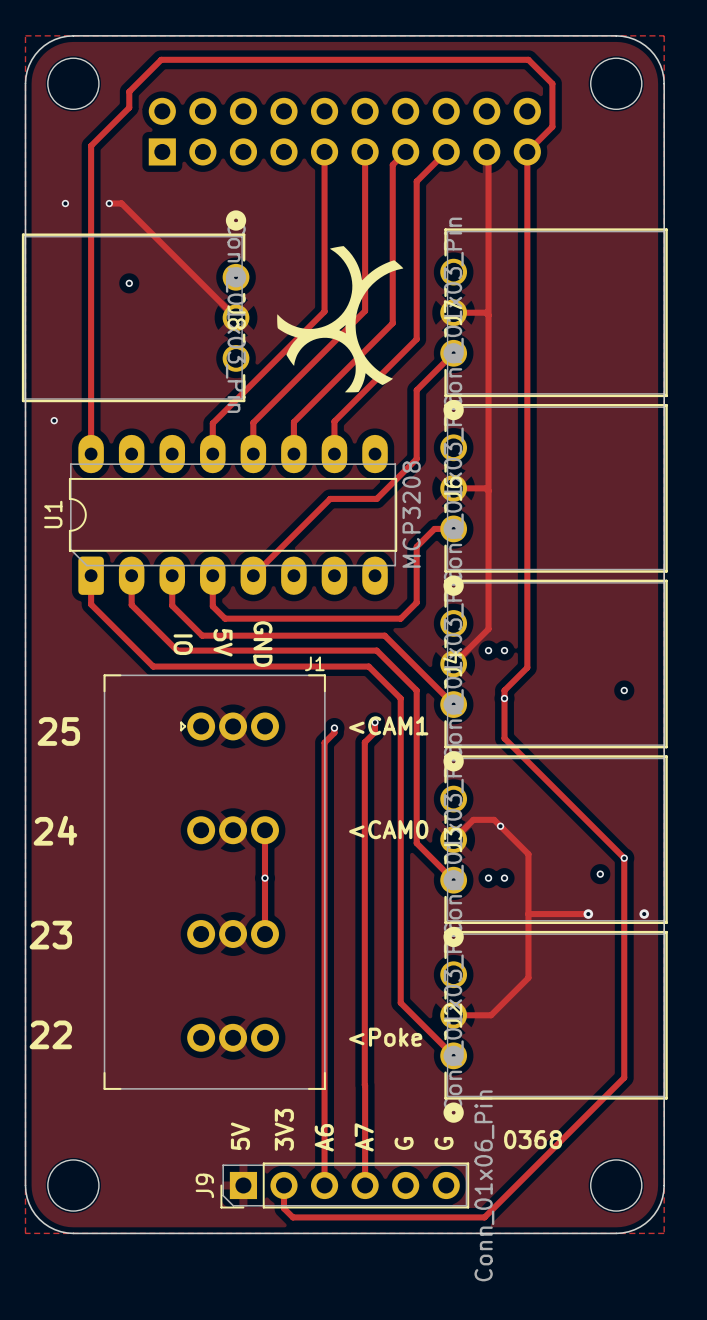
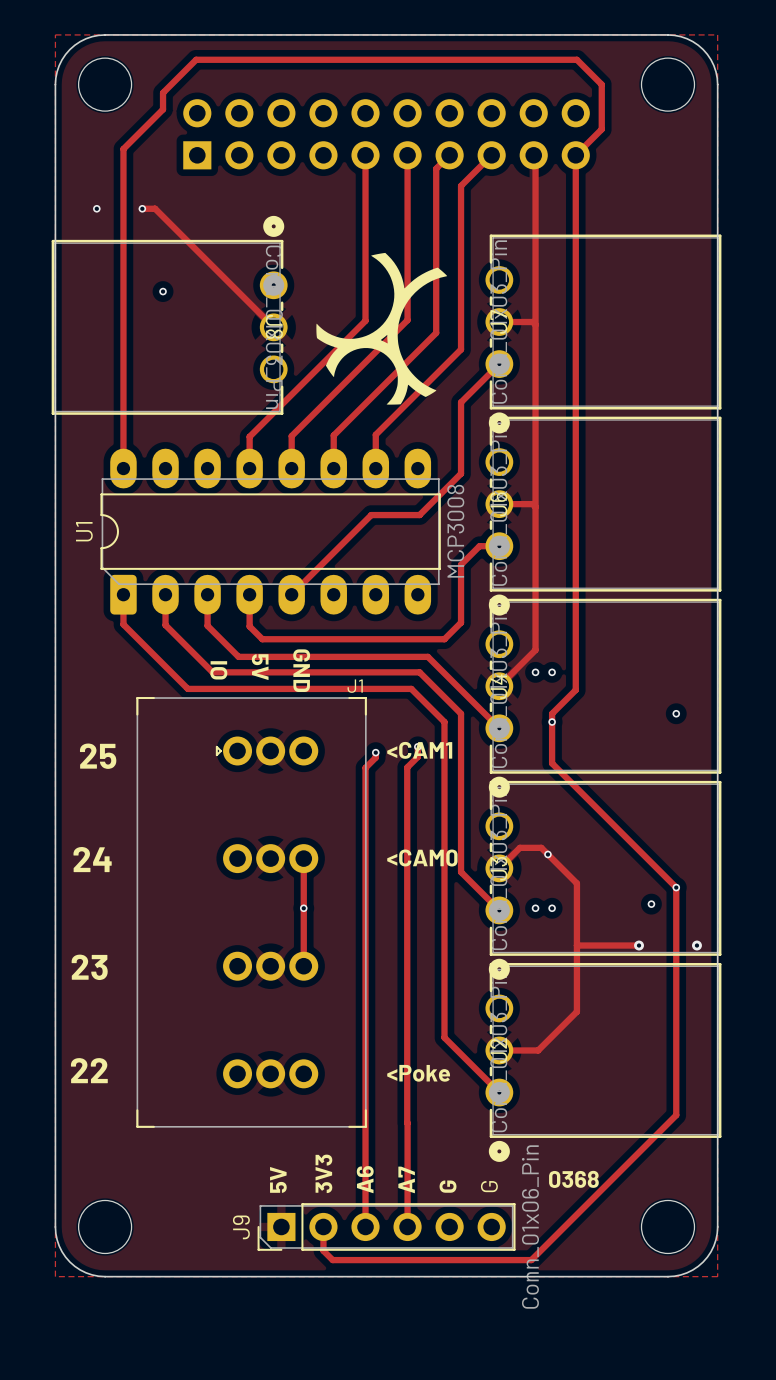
via: (54, 420) -> none
U1 value: MCP3208 (411, 514) -> MCP3008 (455, 531)

